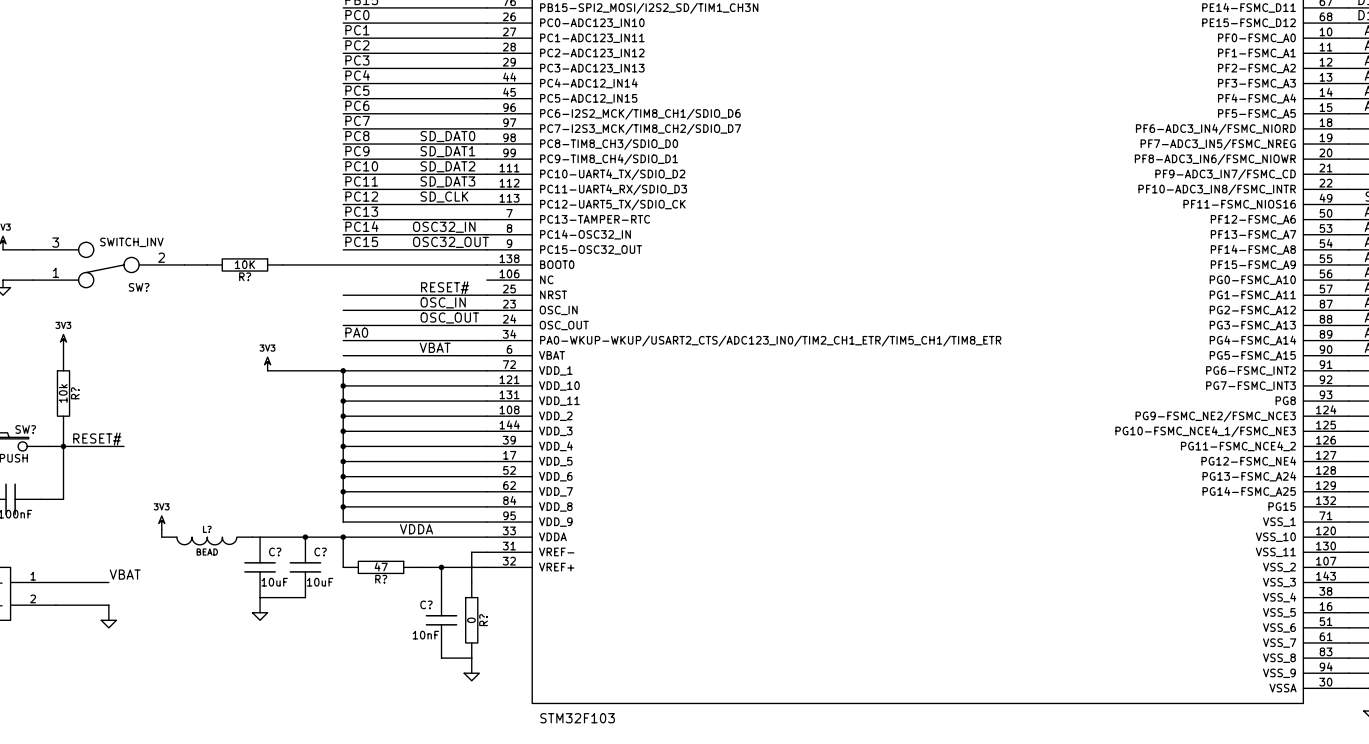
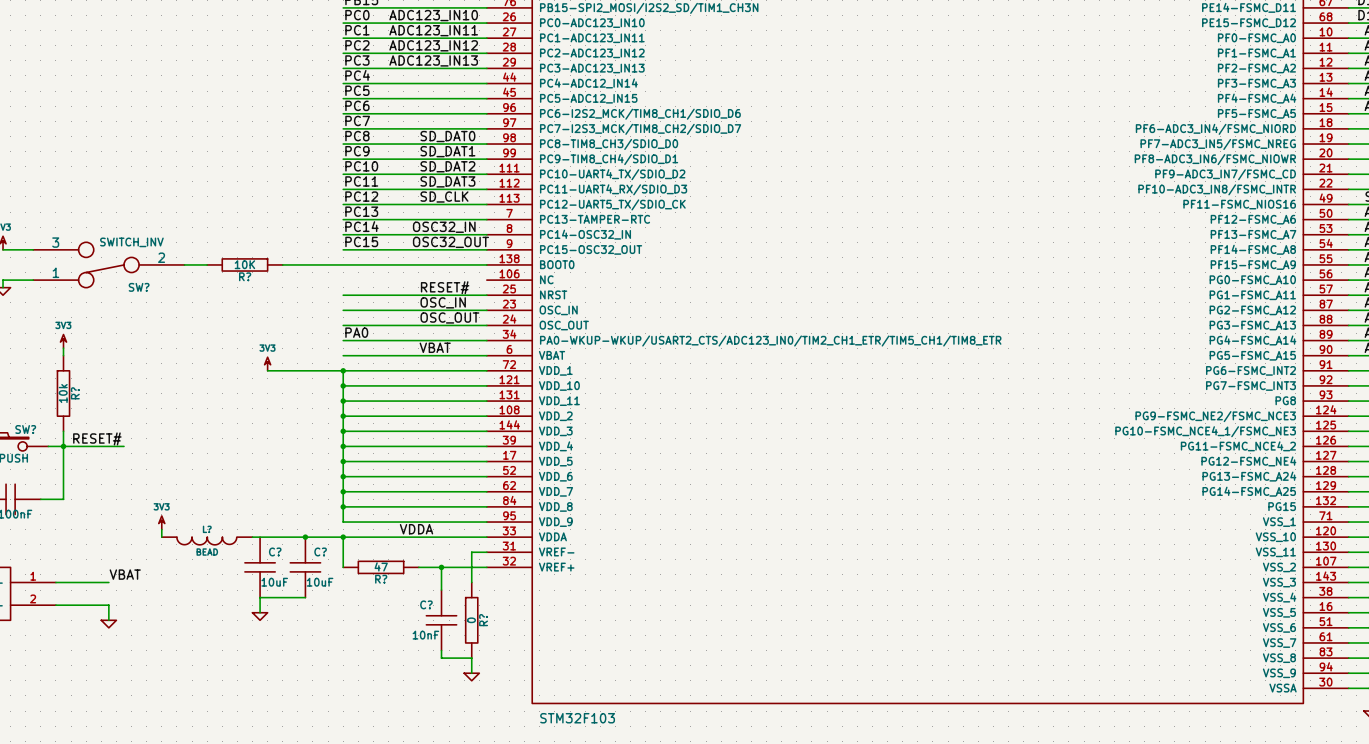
label: none -> ADC123_IN10 (433, 15)
label: none -> ADC123_IN11 (433, 30)
label: none -> ADC123_IN12 (433, 45)
label: none -> ADC123_IN13 (433, 60)

